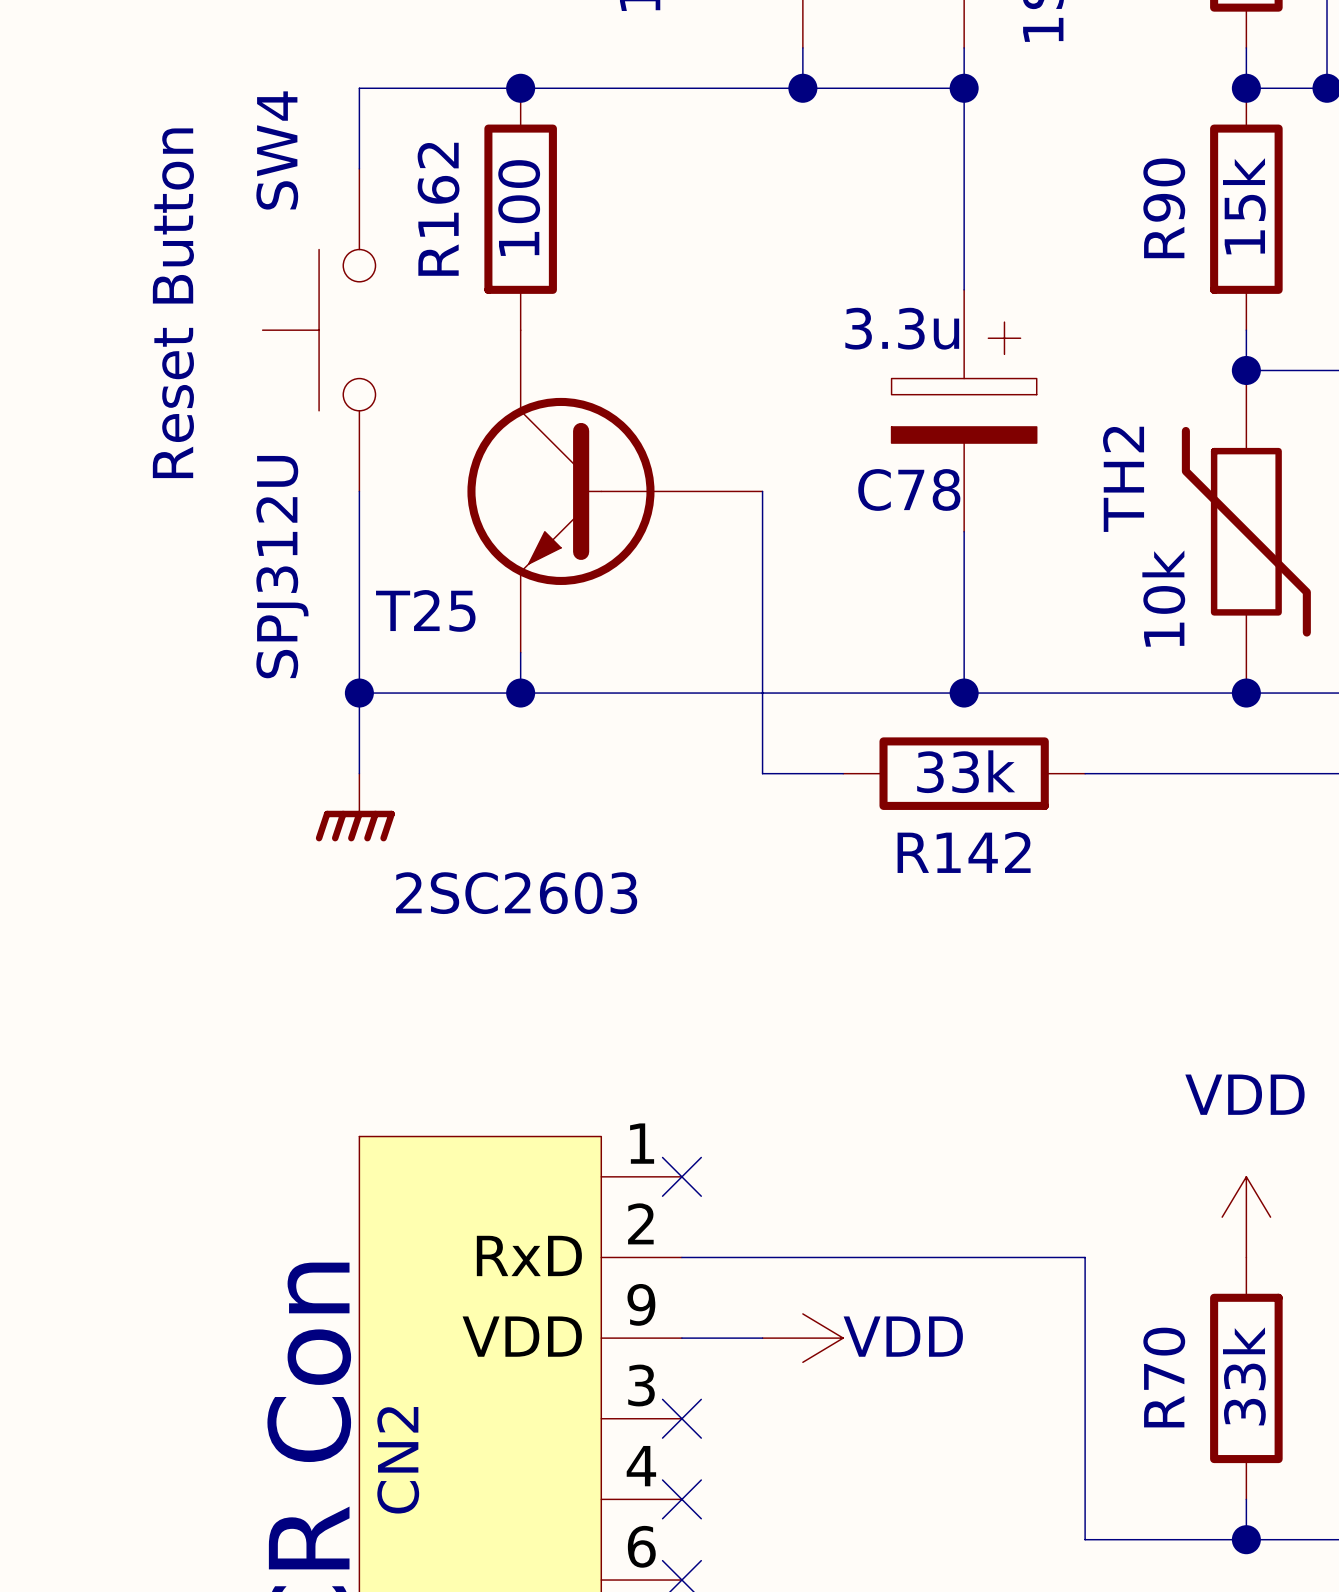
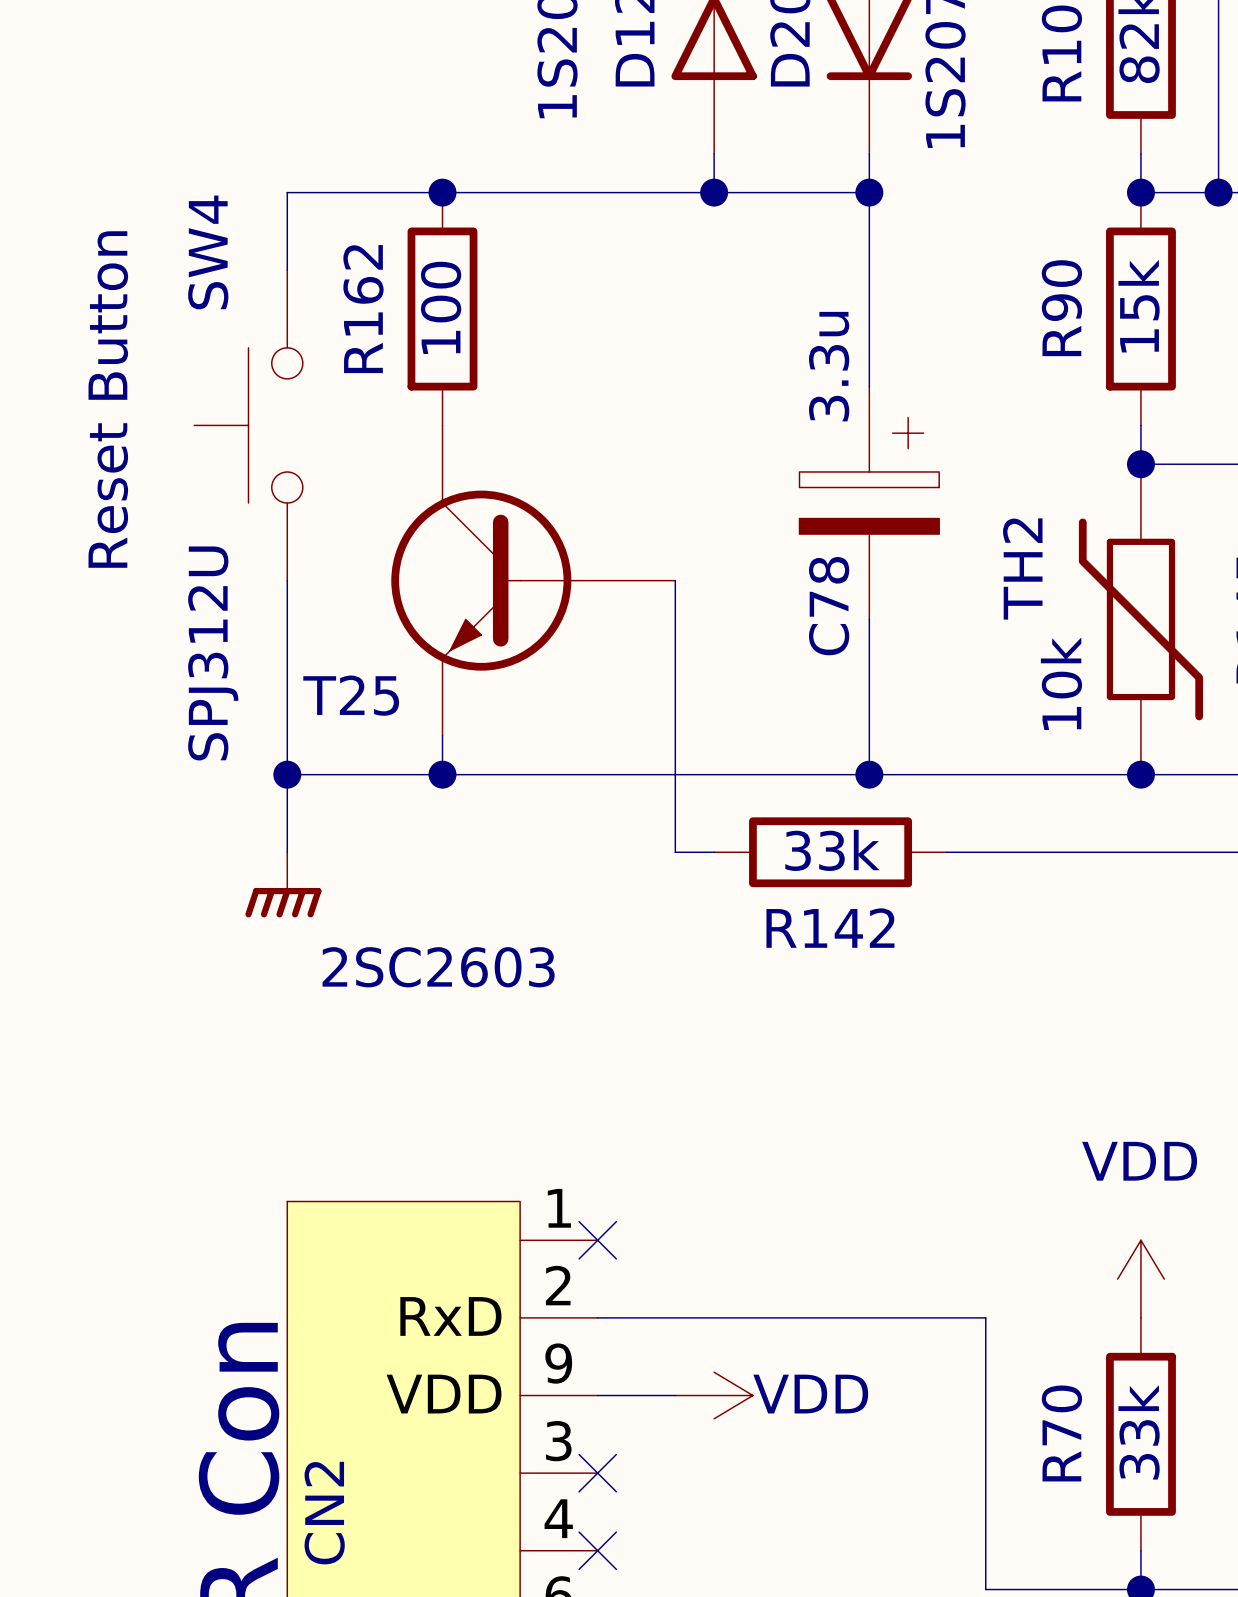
C78 value rotation: 0° (902, 328) -> 90° counterclockwise (829, 366)
C78 name rotation: 0° (909, 489) -> 90° counterclockwise (829, 606)
R142 position: (964, 773) -> (830, 852)

